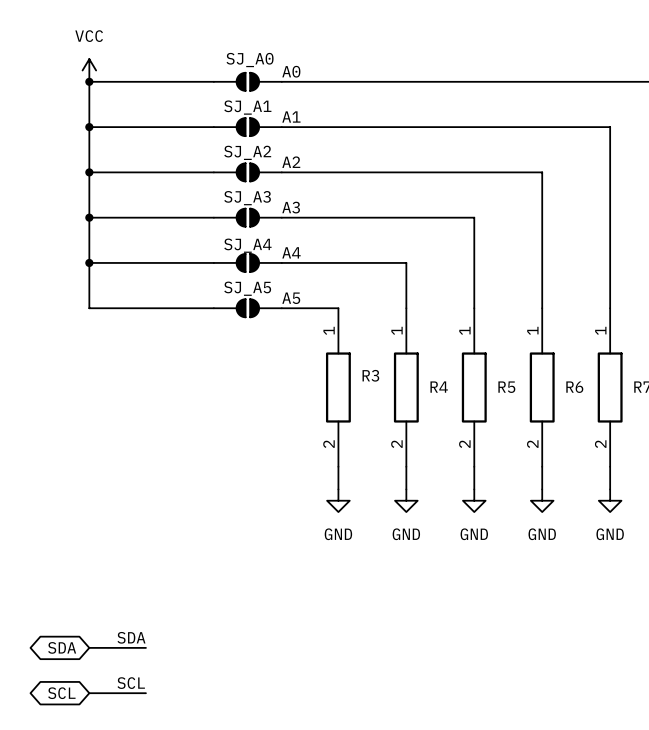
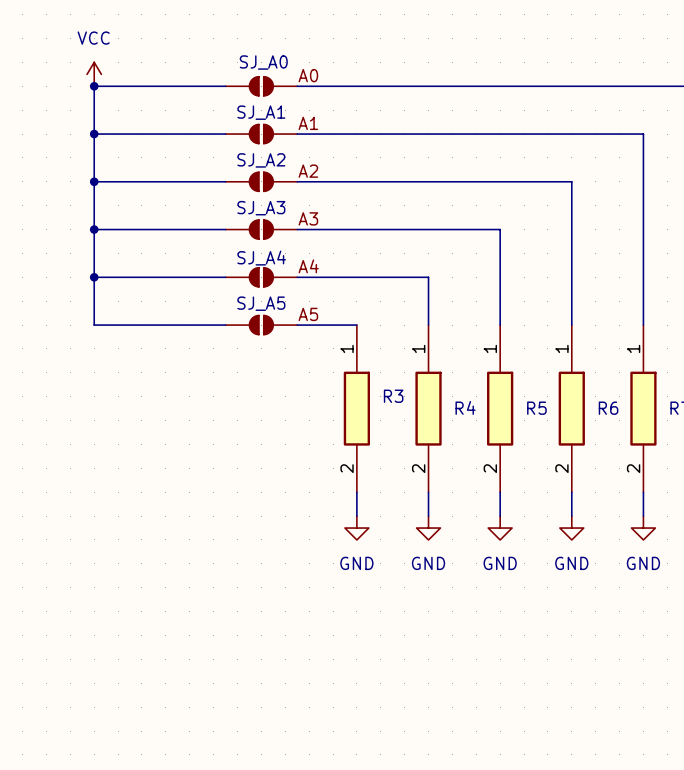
label: SDA (131, 637) -> none
global label: SDA (62, 647) -> none
wire: (89, 647) (145, 647) -> none
label: SCL (131, 683) -> none
global label: SCL (61, 693) -> none
wire: (89, 693) (145, 693) -> none

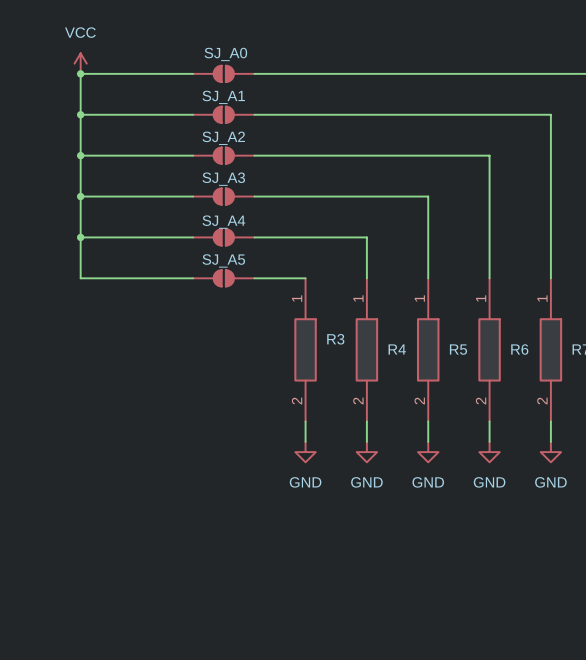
label: A0 (308, 75) -> none
label: A1 (308, 123) -> none
label: A2 (308, 171) -> none
label: A3 (308, 218) -> none
label: A4 (308, 266) -> none
label: A5 (308, 314) -> none

